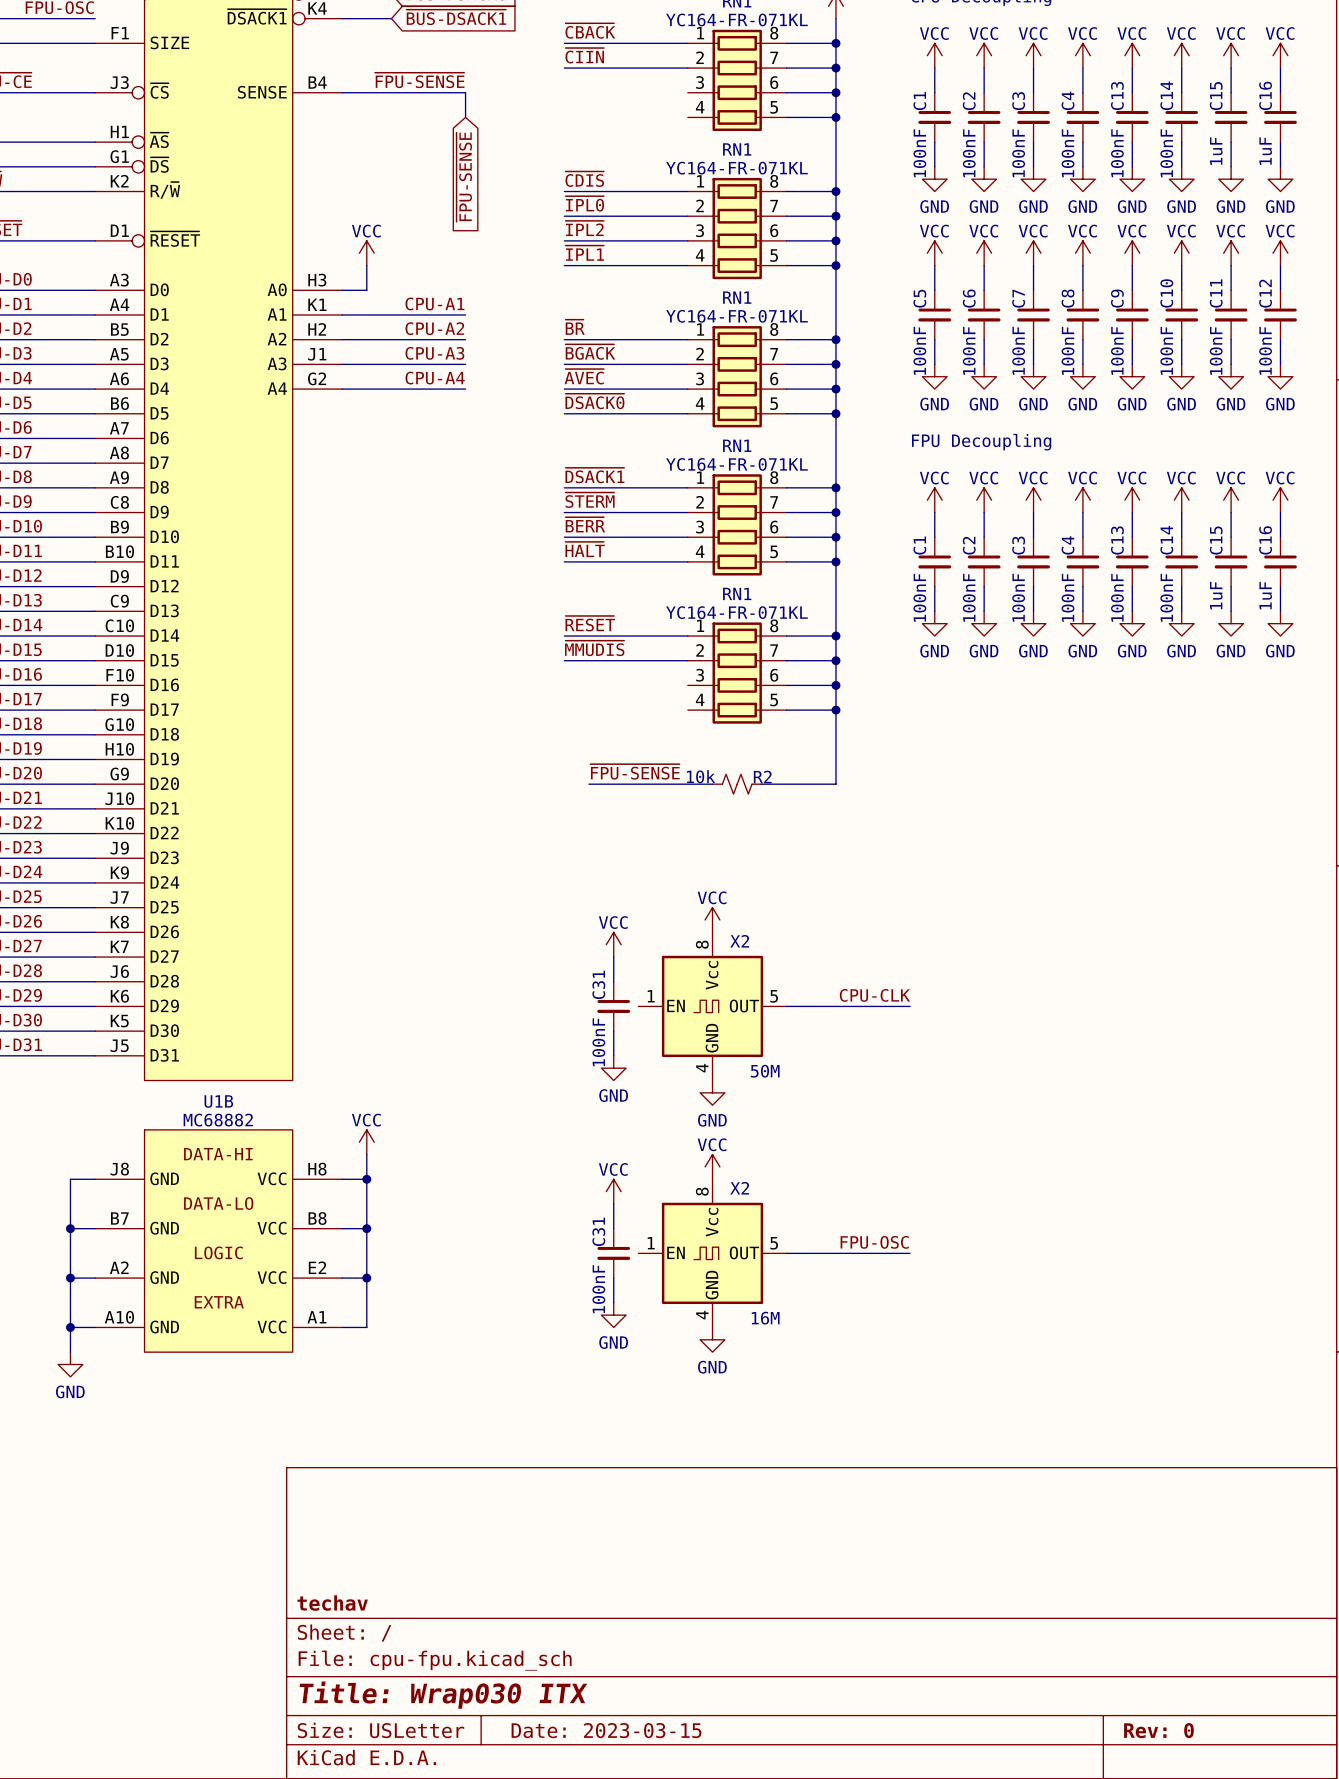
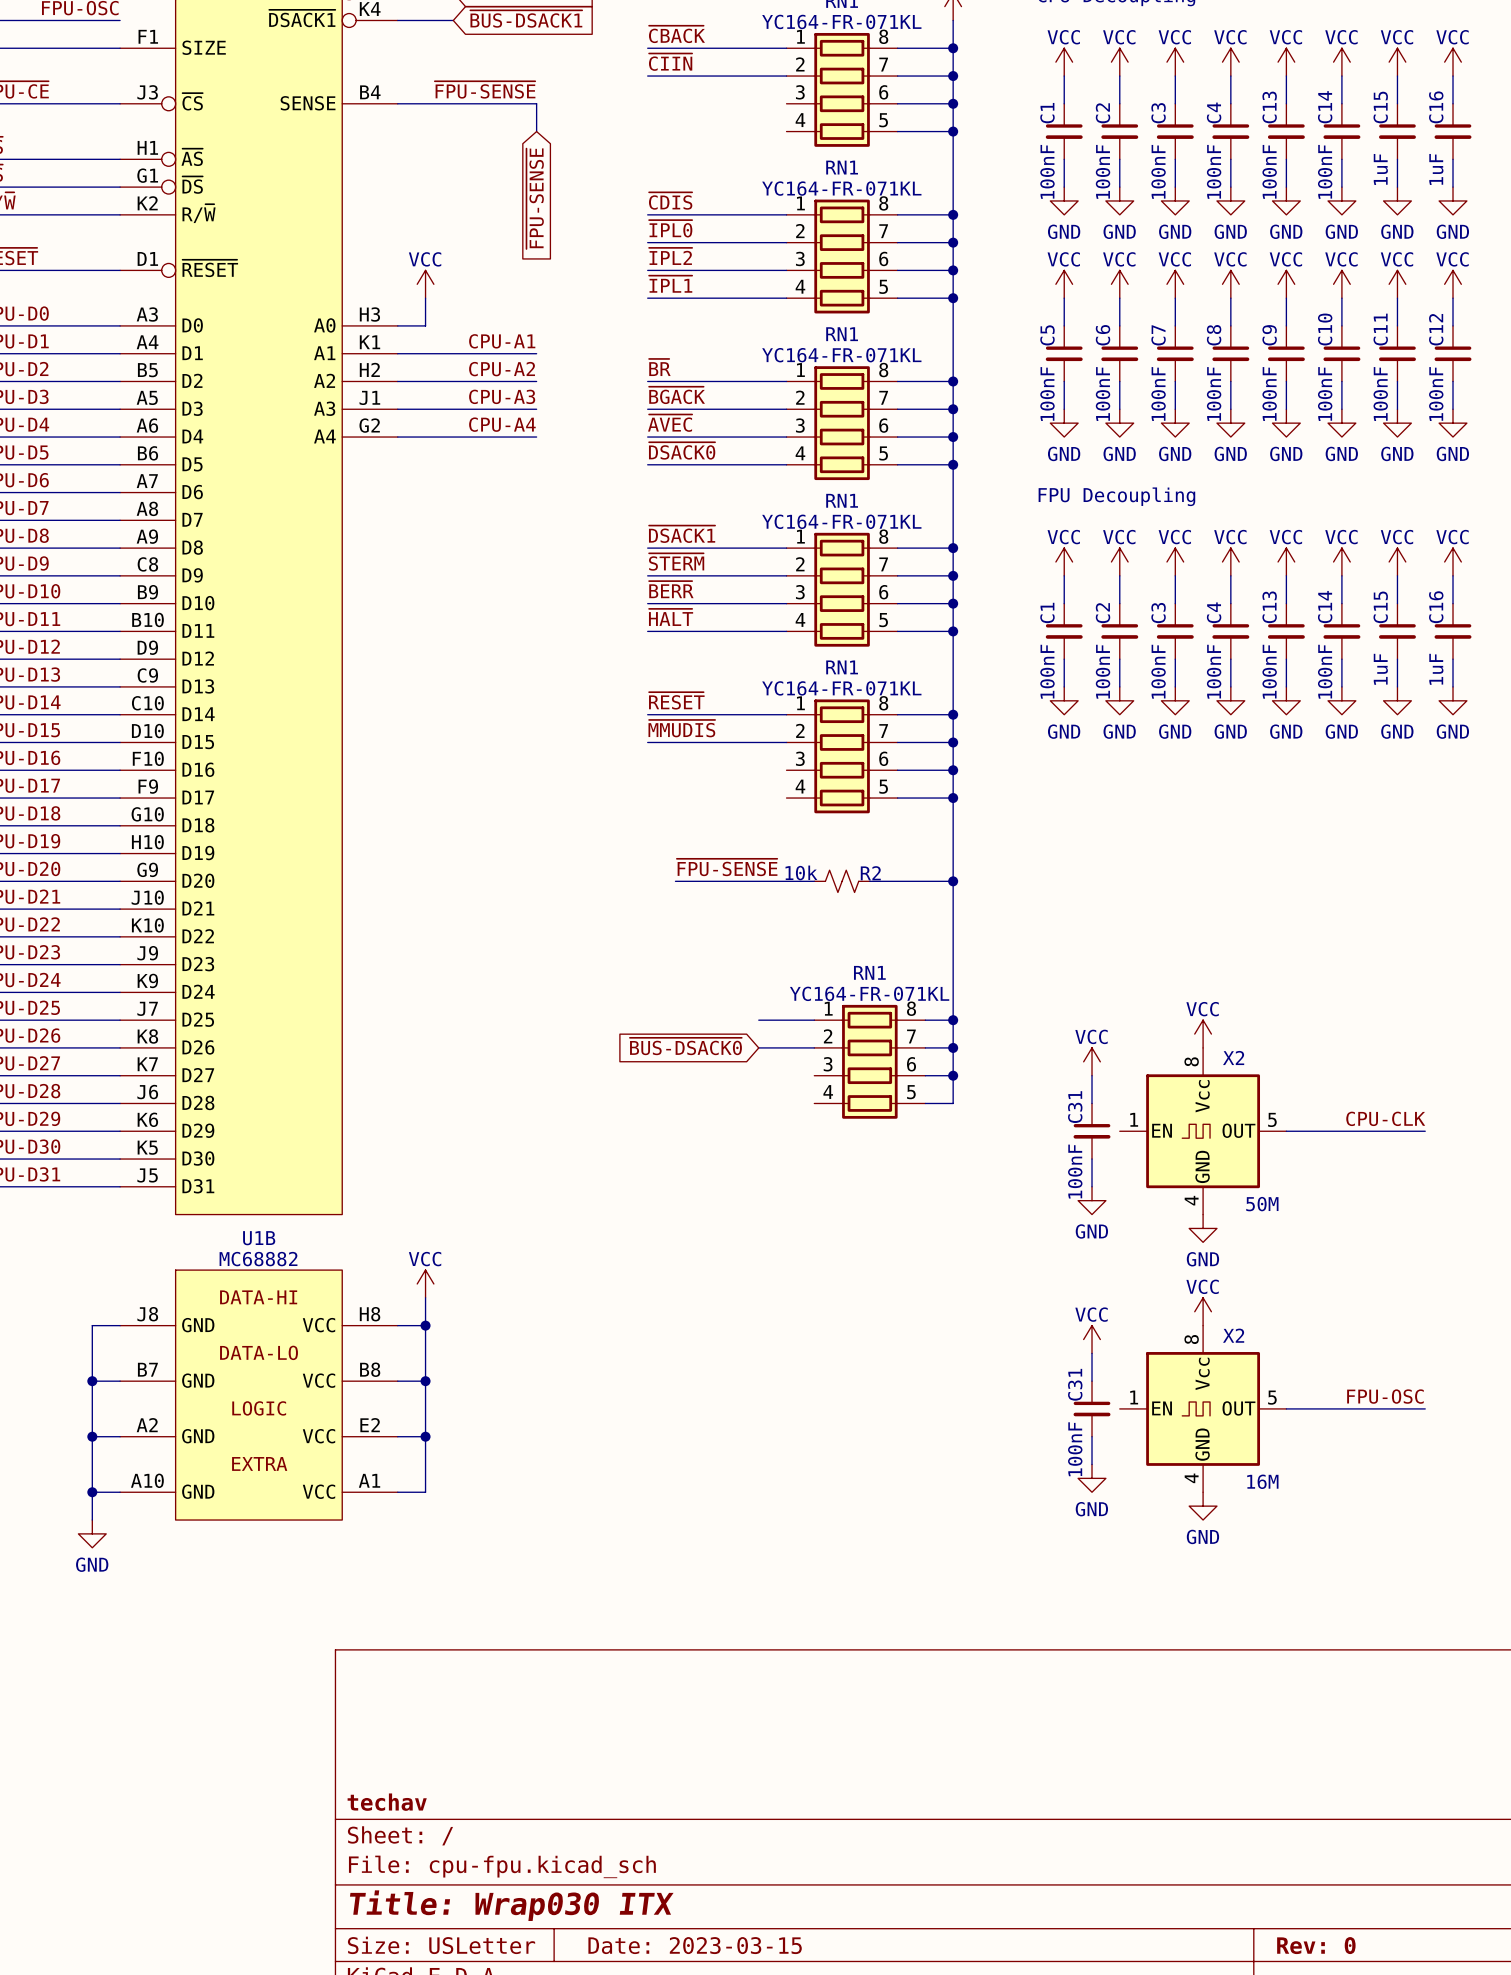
wire: none -> (953, 881) (953, 1103) (925, 1103)
junction: none -> (953, 881)
wire: none -> (758, 1020) (814, 1020)
wire: none -> (925, 1020) (953, 1020)
junction: none -> (953, 1020)
power symbol: VCC (712, 920) -> none
power symbol: none -> VCC (1203, 1034)
global label: none -> ~{BUS-DSACK0} (685, 1046)
wire: none -> (758, 1047) (814, 1047)
wire: none -> (925, 1047) (953, 1047)
junction: none -> (953, 1047)
power symbol: VCC (613, 944) -> none
RN1: none -> YC164-FR-071KL (869, 1061)
power symbol: none -> VCC (1092, 1061)
wire: (613, 957) (613, 981) -> none
wire: none -> (925, 1075) (953, 1075)
junction: none -> (953, 1075)
wire: none -> (1092, 1075) (1092, 1103)
label: CPU-CLK (874, 995) -> none
label: none -> CPU-CLK (1385, 1118)
C31: 100nF (613, 1006) -> none
X2: 50M (712, 1006) -> none
wire: (786, 1006) (910, 1006) -> none
C31: none -> 100nF (1092, 1131)
X2: none -> 50M (1203, 1131)
wire: none -> (1286, 1131) (1425, 1131)
wire: (613, 1031) (613, 1055) -> none
wire: none -> (1092, 1159) (1092, 1186)
power symbol: GND (613, 1068) -> none
power symbol: none -> GND (1092, 1200)
power symbol: GND (712, 1092) -> none
power symbol: none -> GND (1203, 1228)
power symbol: VCC (712, 1166) -> none
power symbol: none -> VCC (1203, 1311)
power symbol: VCC (613, 1191) -> none
power symbol: none -> VCC (1092, 1339)
wire: (613, 1203) (613, 1228) -> none
wire: none -> (1092, 1353) (1092, 1381)
label: FPU-OSC (874, 1242) -> none
label: none -> FPU-OSC (1385, 1396)
C31: 100nF (613, 1253) -> none
X2: 16M (712, 1253) -> none
wire: (786, 1253) (910, 1253) -> none
C31: none -> 100nF (1092, 1408)
X2: none -> 16M (1203, 1408)
wire: none -> (1286, 1408) (1425, 1408)
wire: (613, 1278) (613, 1302) -> none
wire: none -> (1092, 1436) (1092, 1464)
power symbol: GND (613, 1315) -> none
power symbol: none -> GND (1092, 1478)
power symbol: GND (712, 1339) -> none
power symbol: none -> GND (1203, 1506)

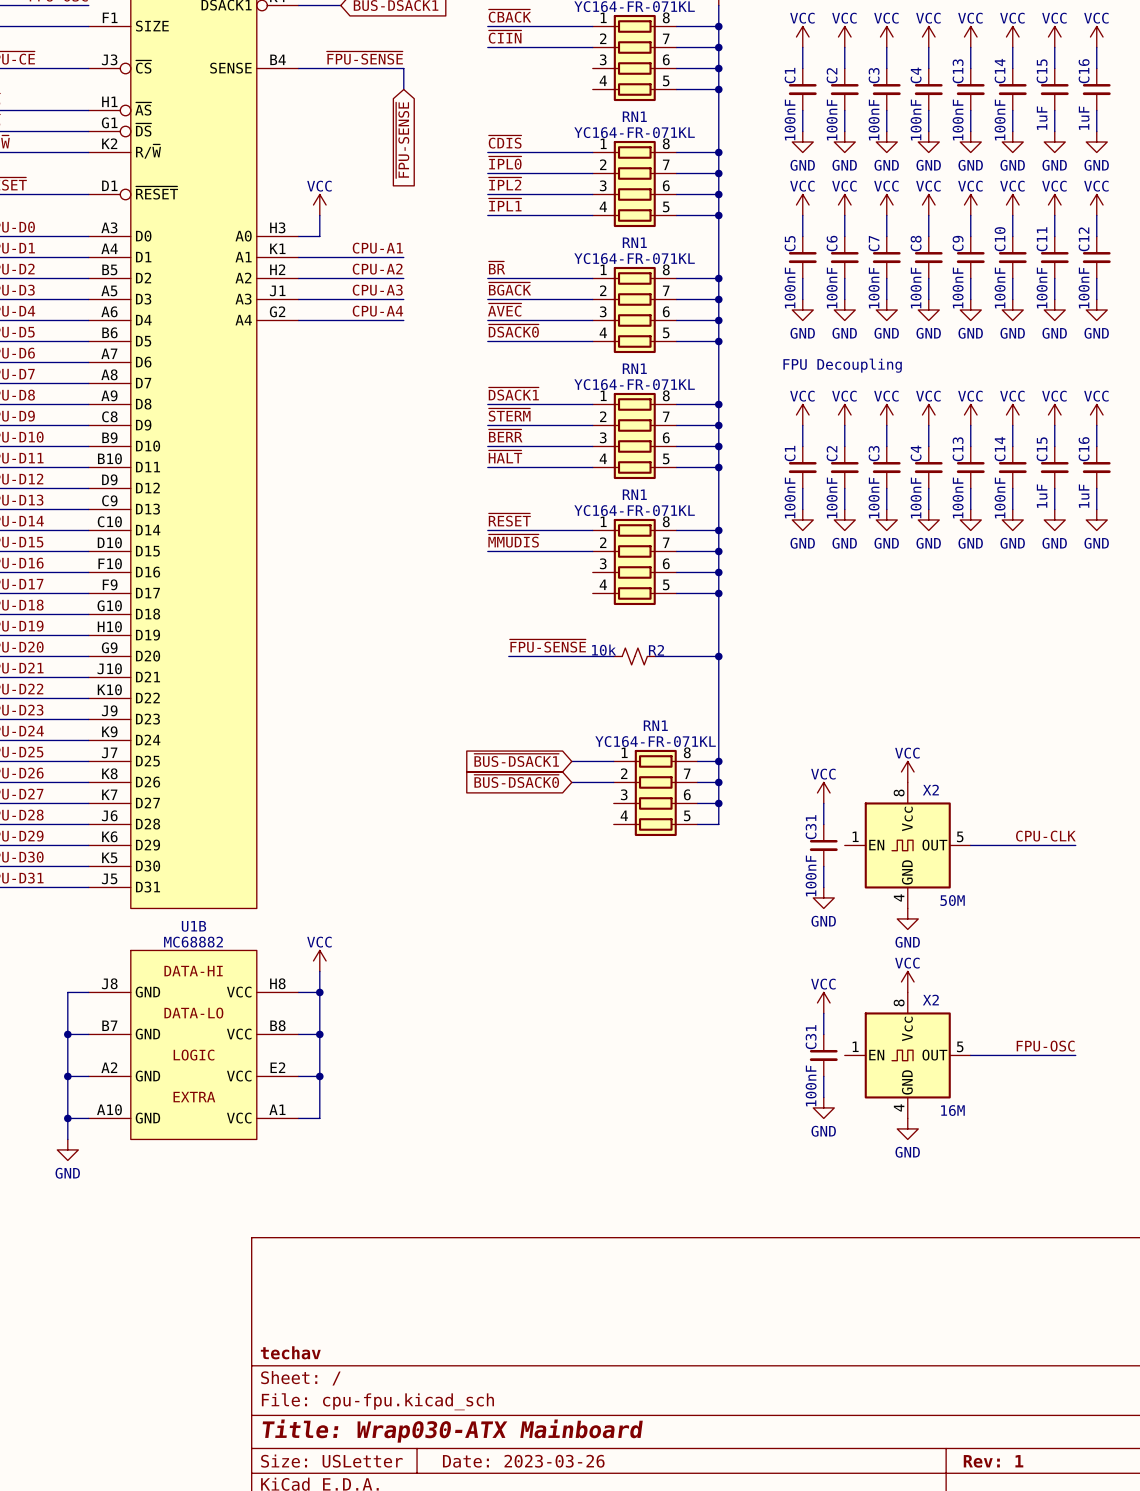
global label: none -> ~{BUS-DSACK1} (516, 760)
title block: Title: Wrap030 ITX (511, 1905) -> Title: Wrap030-ATX Mainboard (452, 1431)
title block: Date: 2023-03-15 (695, 1945) -> Date: 2023-03-26 (523, 1461)
title block: Rev: 0 (1316, 1945) -> Rev: 1 (993, 1461)

